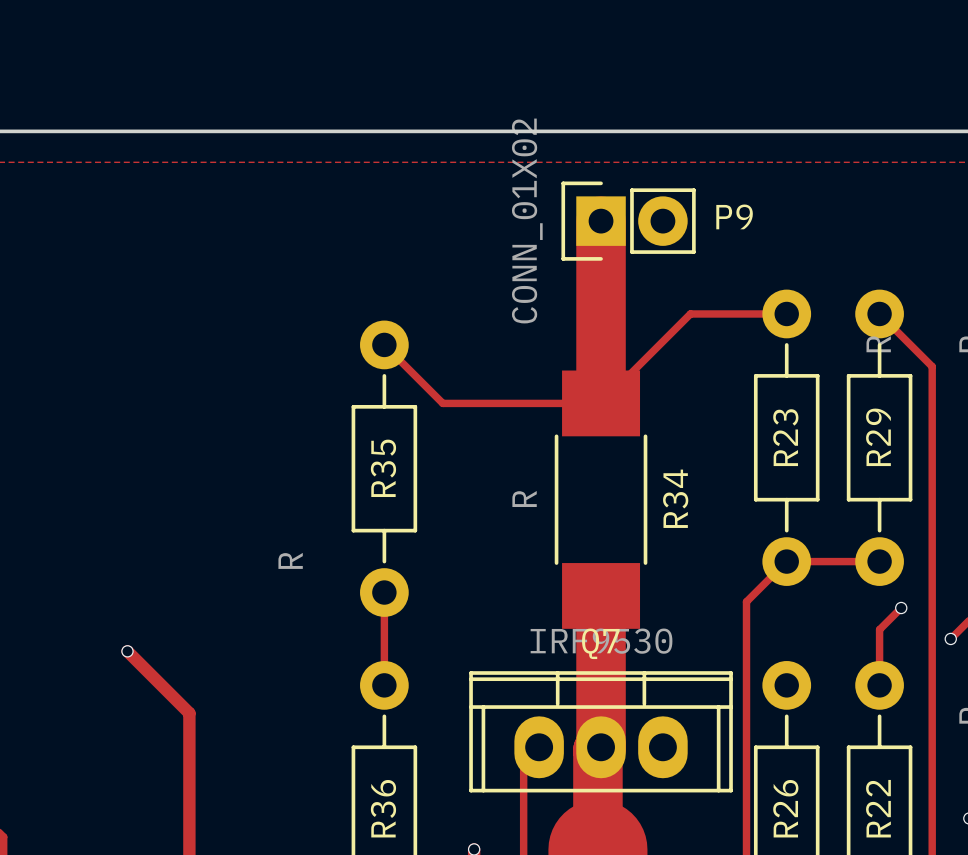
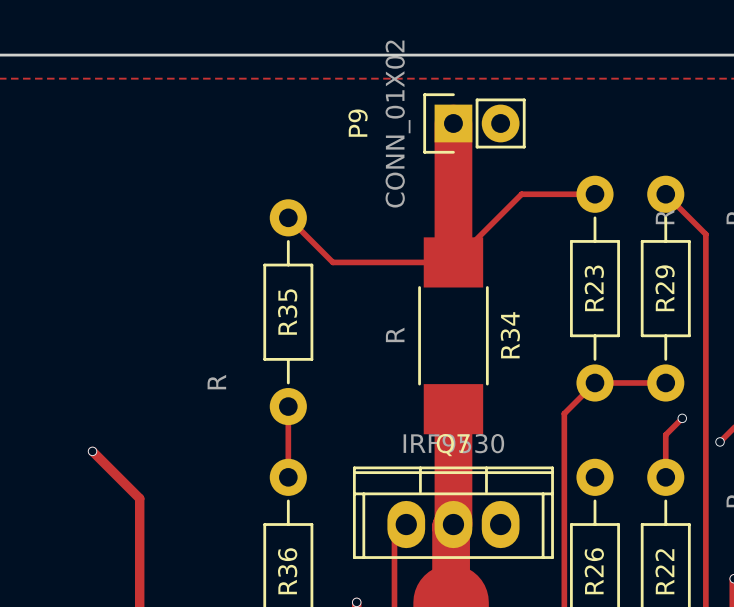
P9 name rotation: 0° (734, 216) -> 90° counterclockwise (358, 123)
P9 name position: P9 (734, 216) -> P9 (358, 123)

